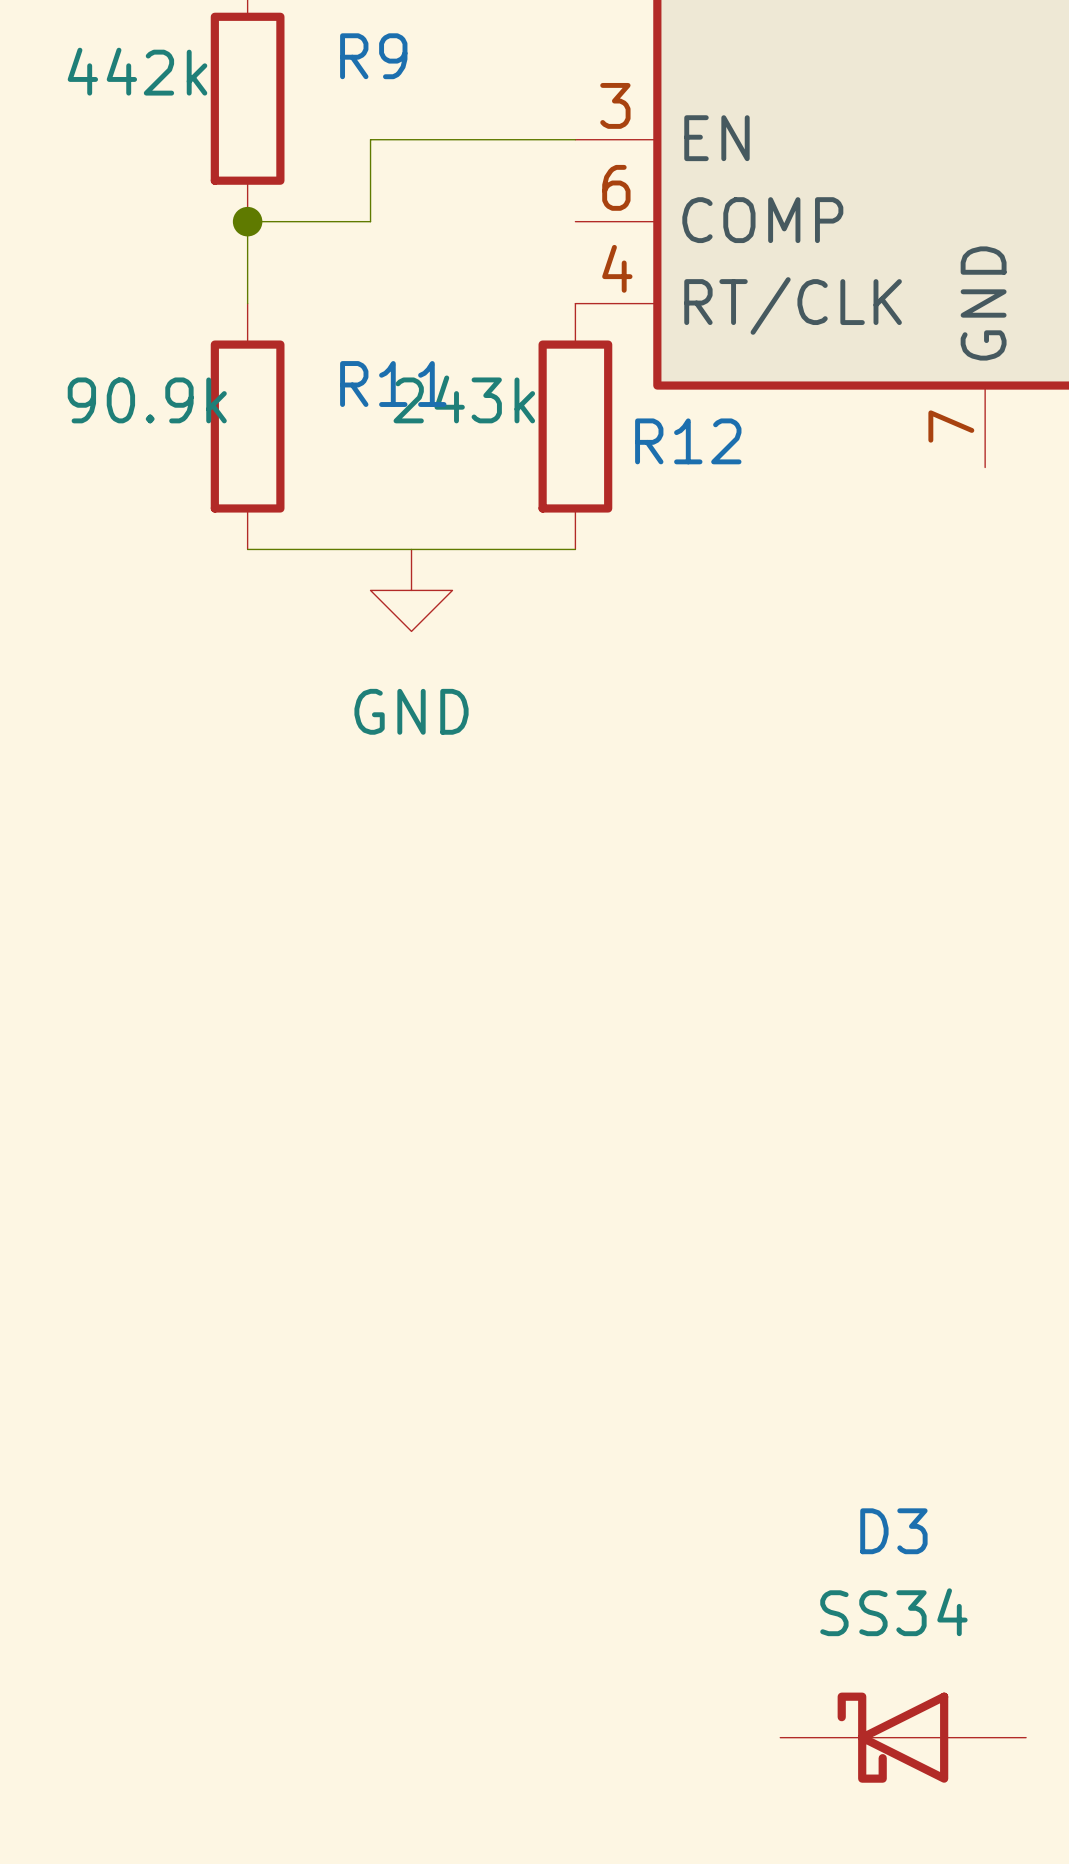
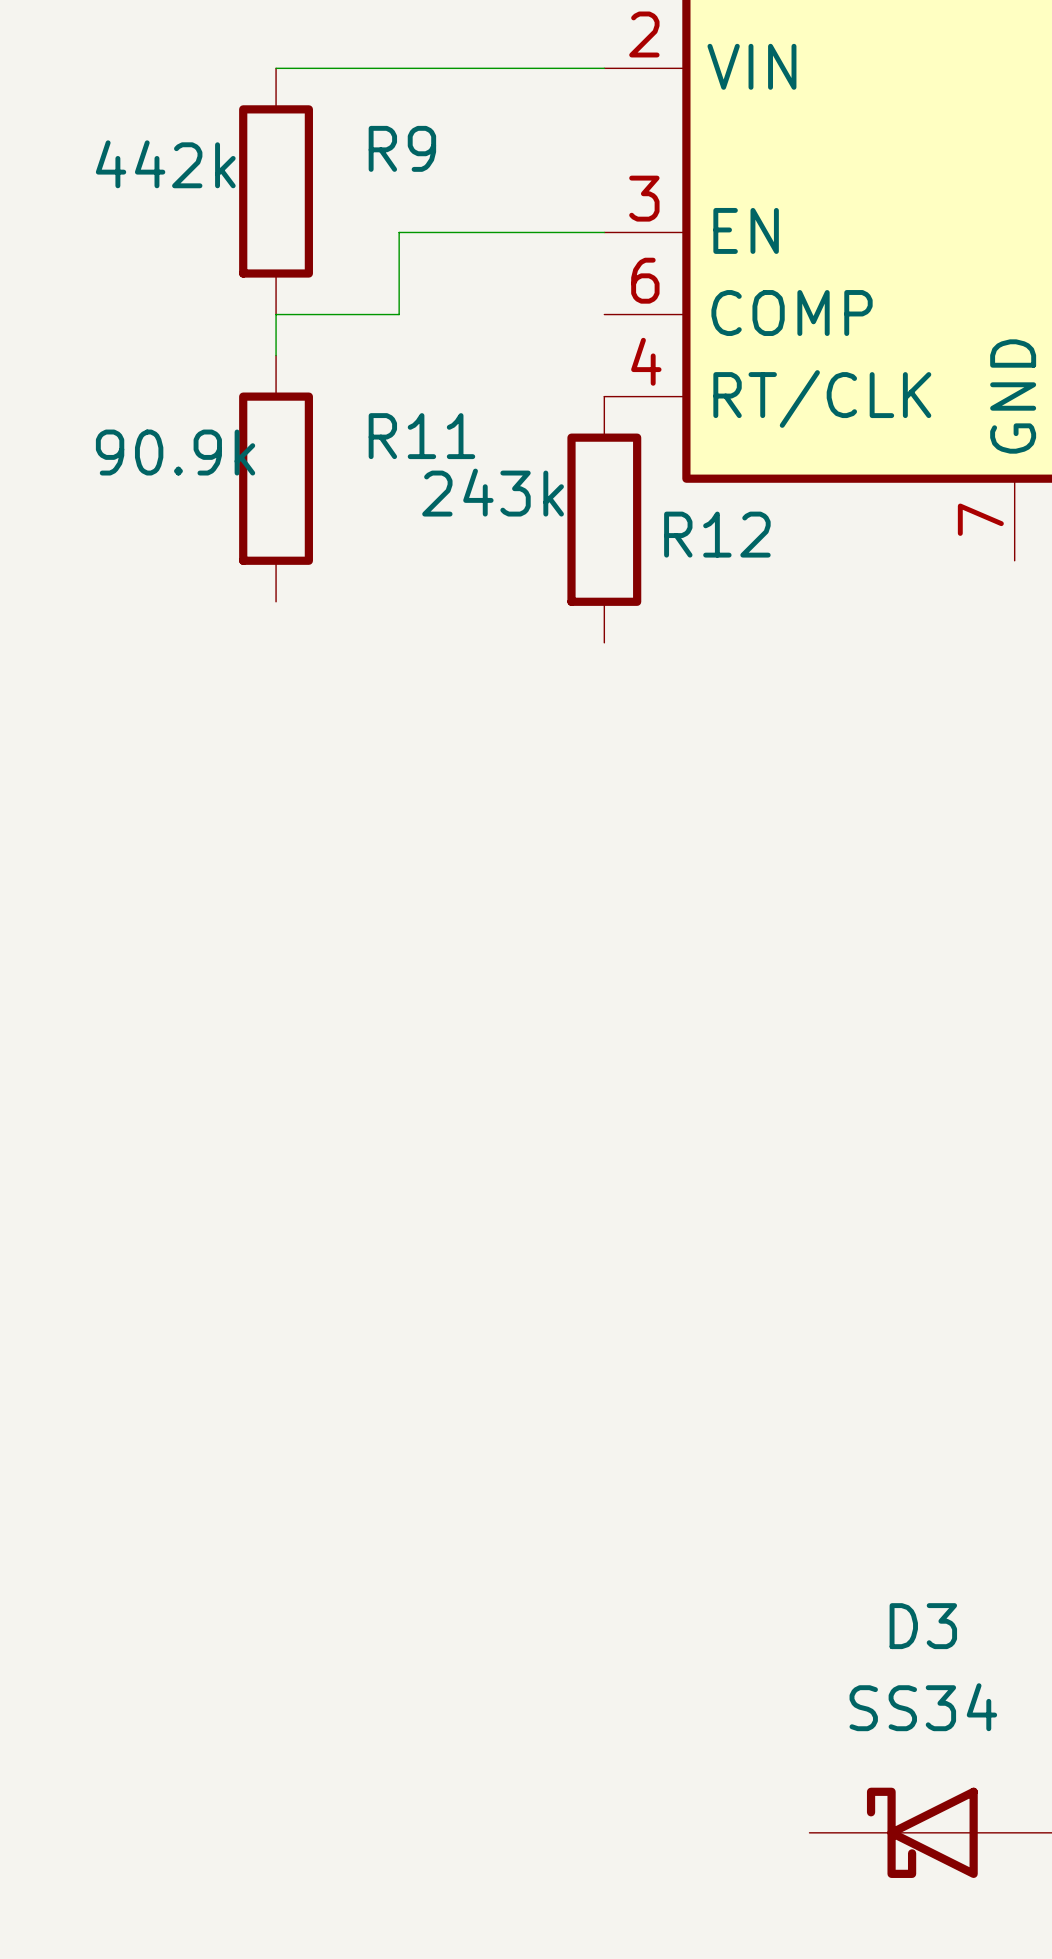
junction: (247, 221) -> none
R11 position: (247, 426) -> (276, 478)
wire: (247, 549) (575, 549) -> none
power symbol: GND (411, 590) -> none

